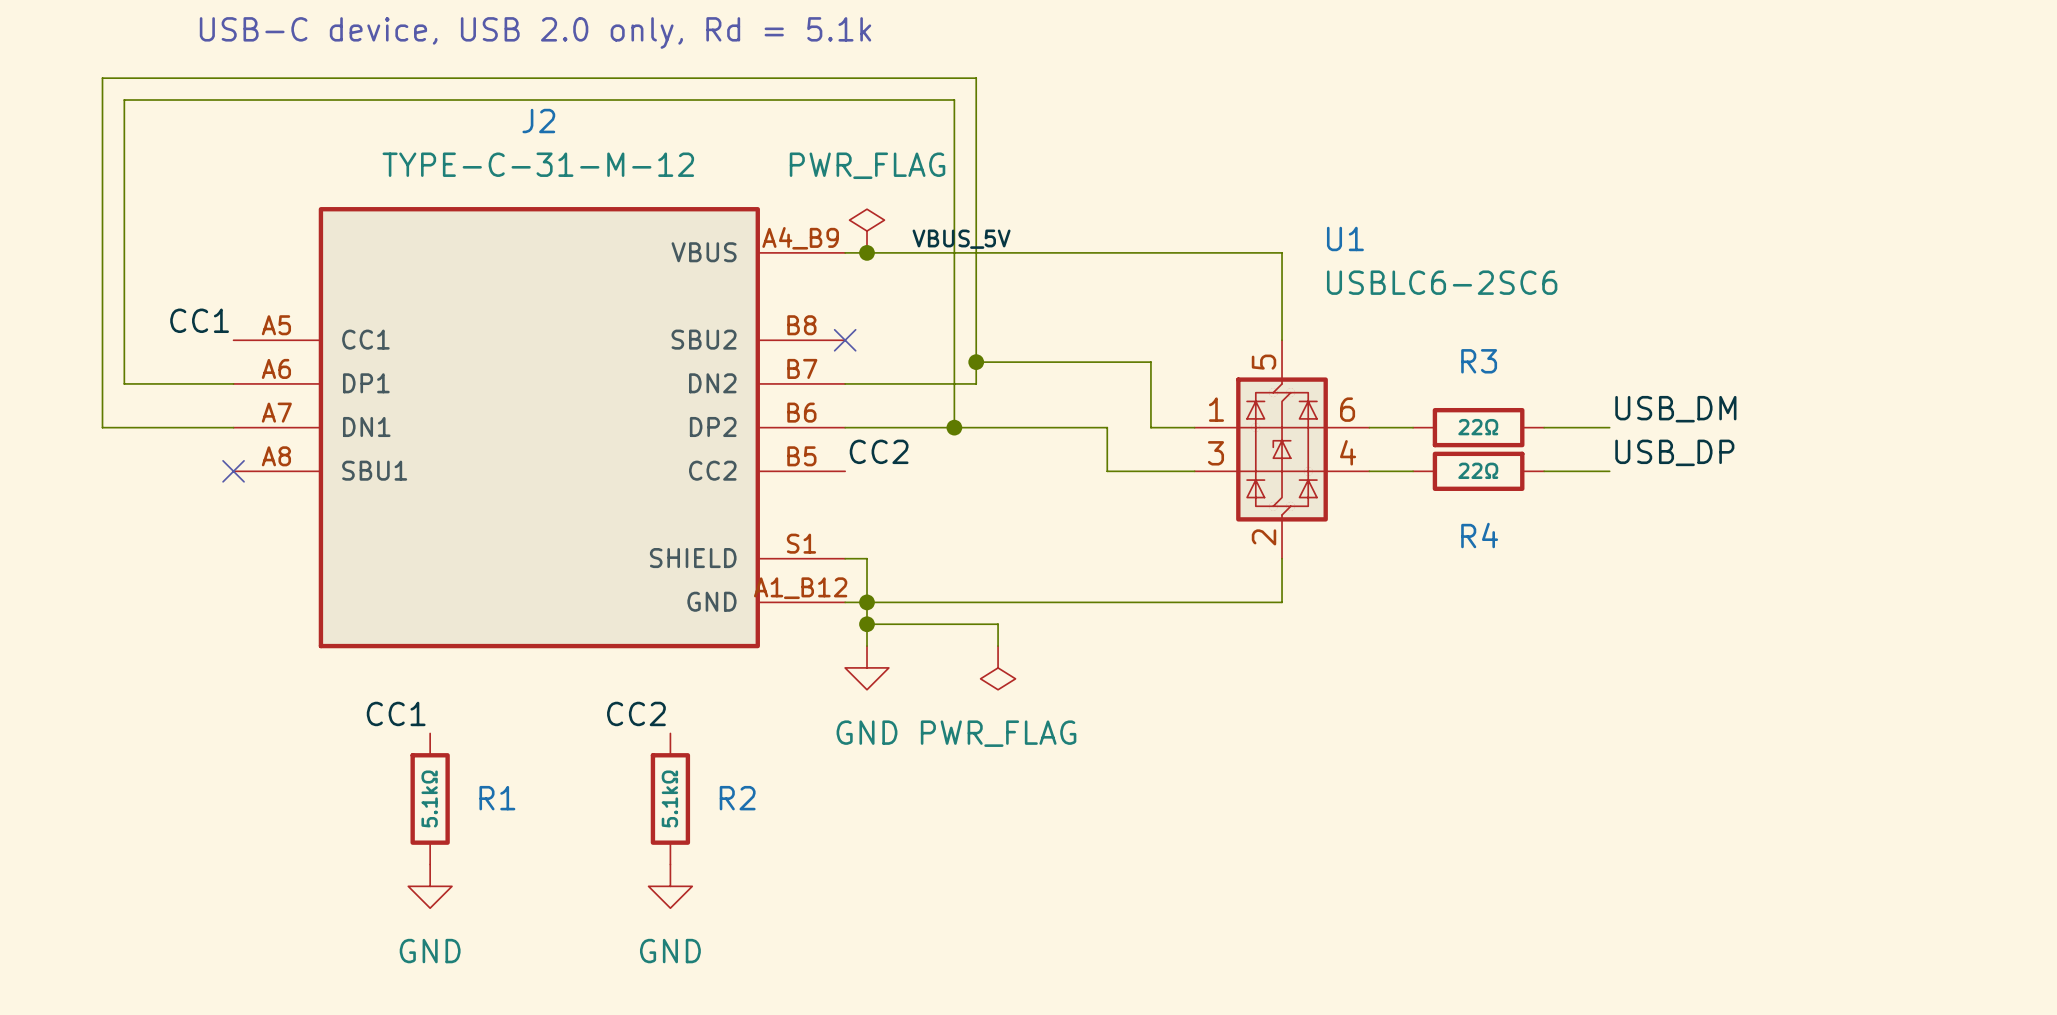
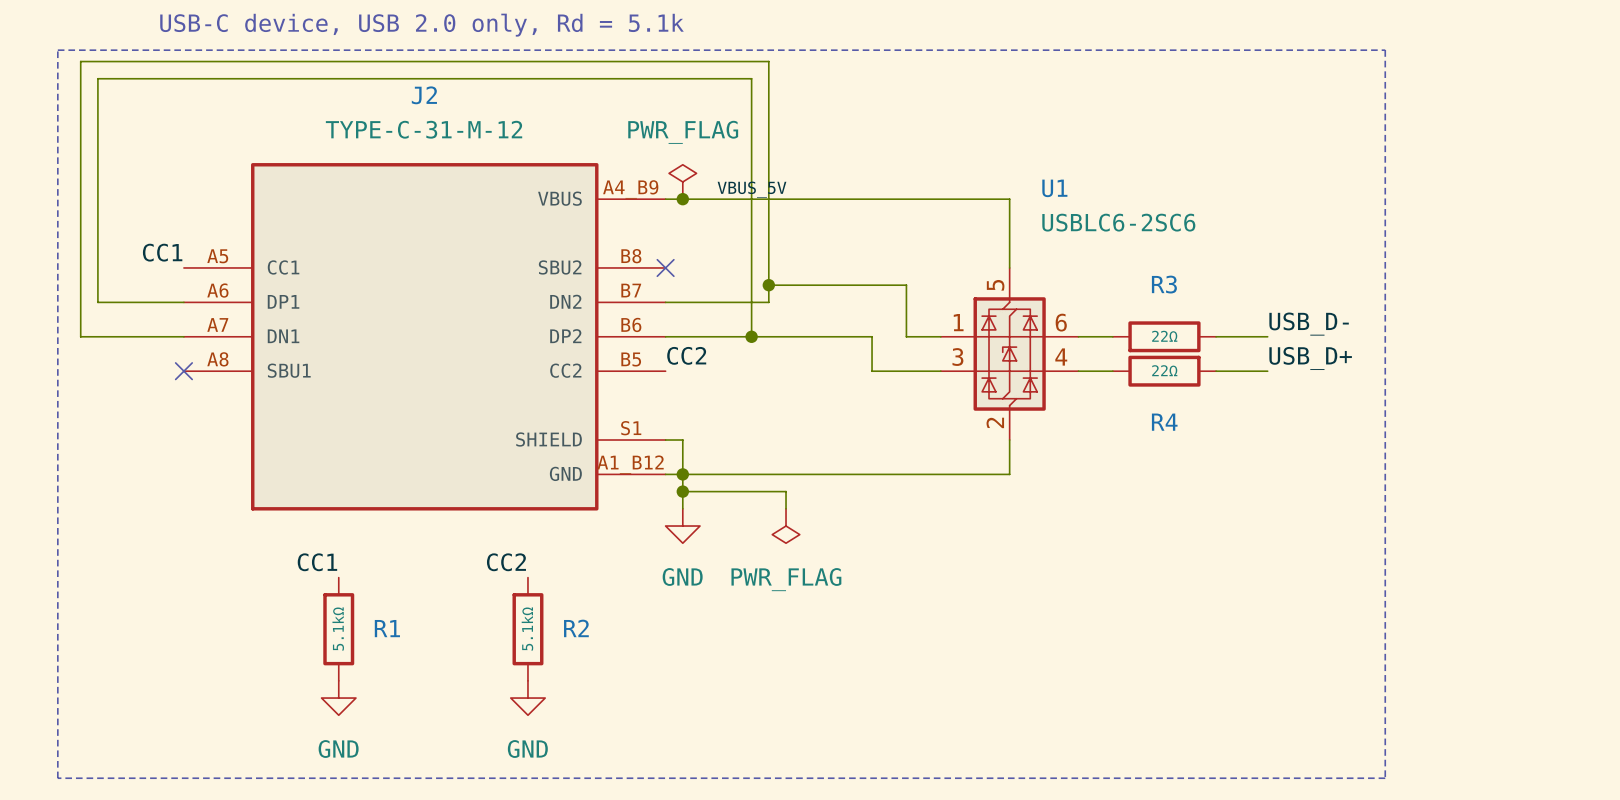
line: none -> (57, 50) (1385, 50) (1385, 778) (57, 778) (57, 50)
label: USB_DM (1675, 409) -> USB_D- (1309, 324)
label: USB_DP (1674, 452) -> USB_D+ (1310, 358)

